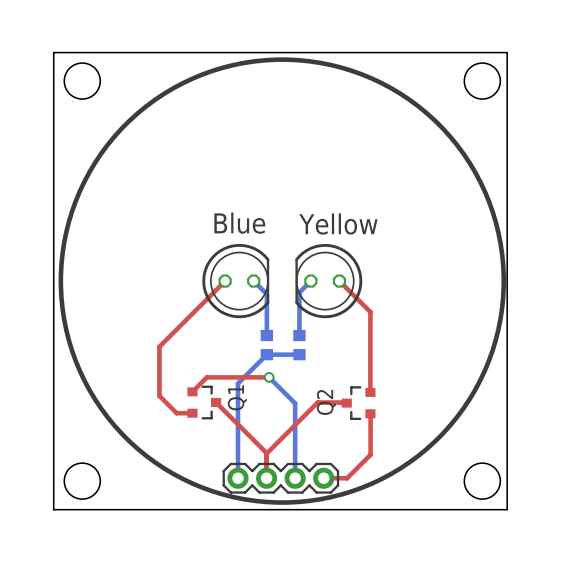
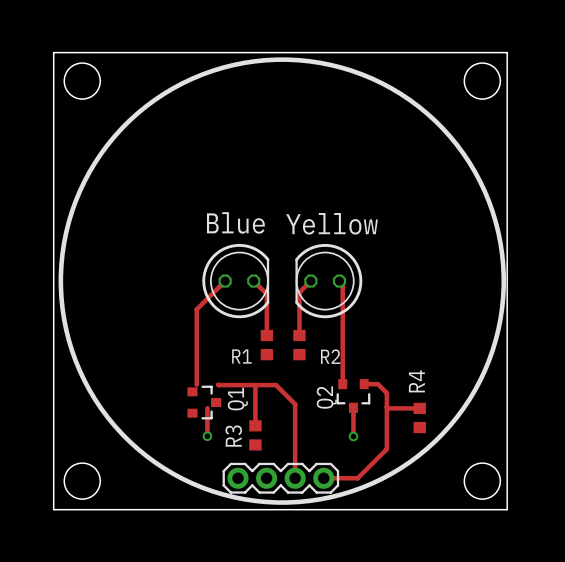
top track: none -> (253, 281) (266, 294) (266, 335)
bottom track: (253, 281) (266, 294) (266, 335) -> none
top track: none -> (310, 281) (299, 292) (299, 335)
bottom track: (310, 281) (299, 292) (299, 335) -> none
top track: (342, 284) (370, 312) (370, 392) -> (342, 284) (342, 384)
top track: (196, 309) (159, 346) (159, 395) (176, 413) (192, 413) -> (196, 309) (196, 384)
R1 side: bottom (266, 345) -> top (266, 345)
R2 side: bottom (299, 345) -> top (299, 345)
bottom track: (299, 354) (266, 354) (238, 383) (238, 478) -> none
top track: (269, 377) (206, 377) (192, 391) -> none
bottom track: (269, 377) (295, 403) (295, 478) -> none
via: (269, 377) -> none
top track: none -> (218, 384) (276, 385) (295, 404) (295, 478)
top track: none -> (254, 385) (255, 425)
top track: (216, 402) (266, 453) (266, 478) -> none
top track: (341, 403) (346, 403) (317, 402) (266, 453) -> none
Q2 rotation: 0° (358, 403) -> 90° counterclockwise (353, 395)
top track: none -> (353, 407) (353, 436)
top track: none -> (386, 407) (419, 408)
top track: none -> (207, 408) (207, 436)
top track: (370, 413) (370, 454) (347, 478) -> (364, 384) (377, 384) (386, 393) (386, 449) (357, 478) (347, 478)
R4: none -> (419, 417)
R3: none -> (255, 435)
via: none -> (207, 436)
via: none -> (353, 436)

